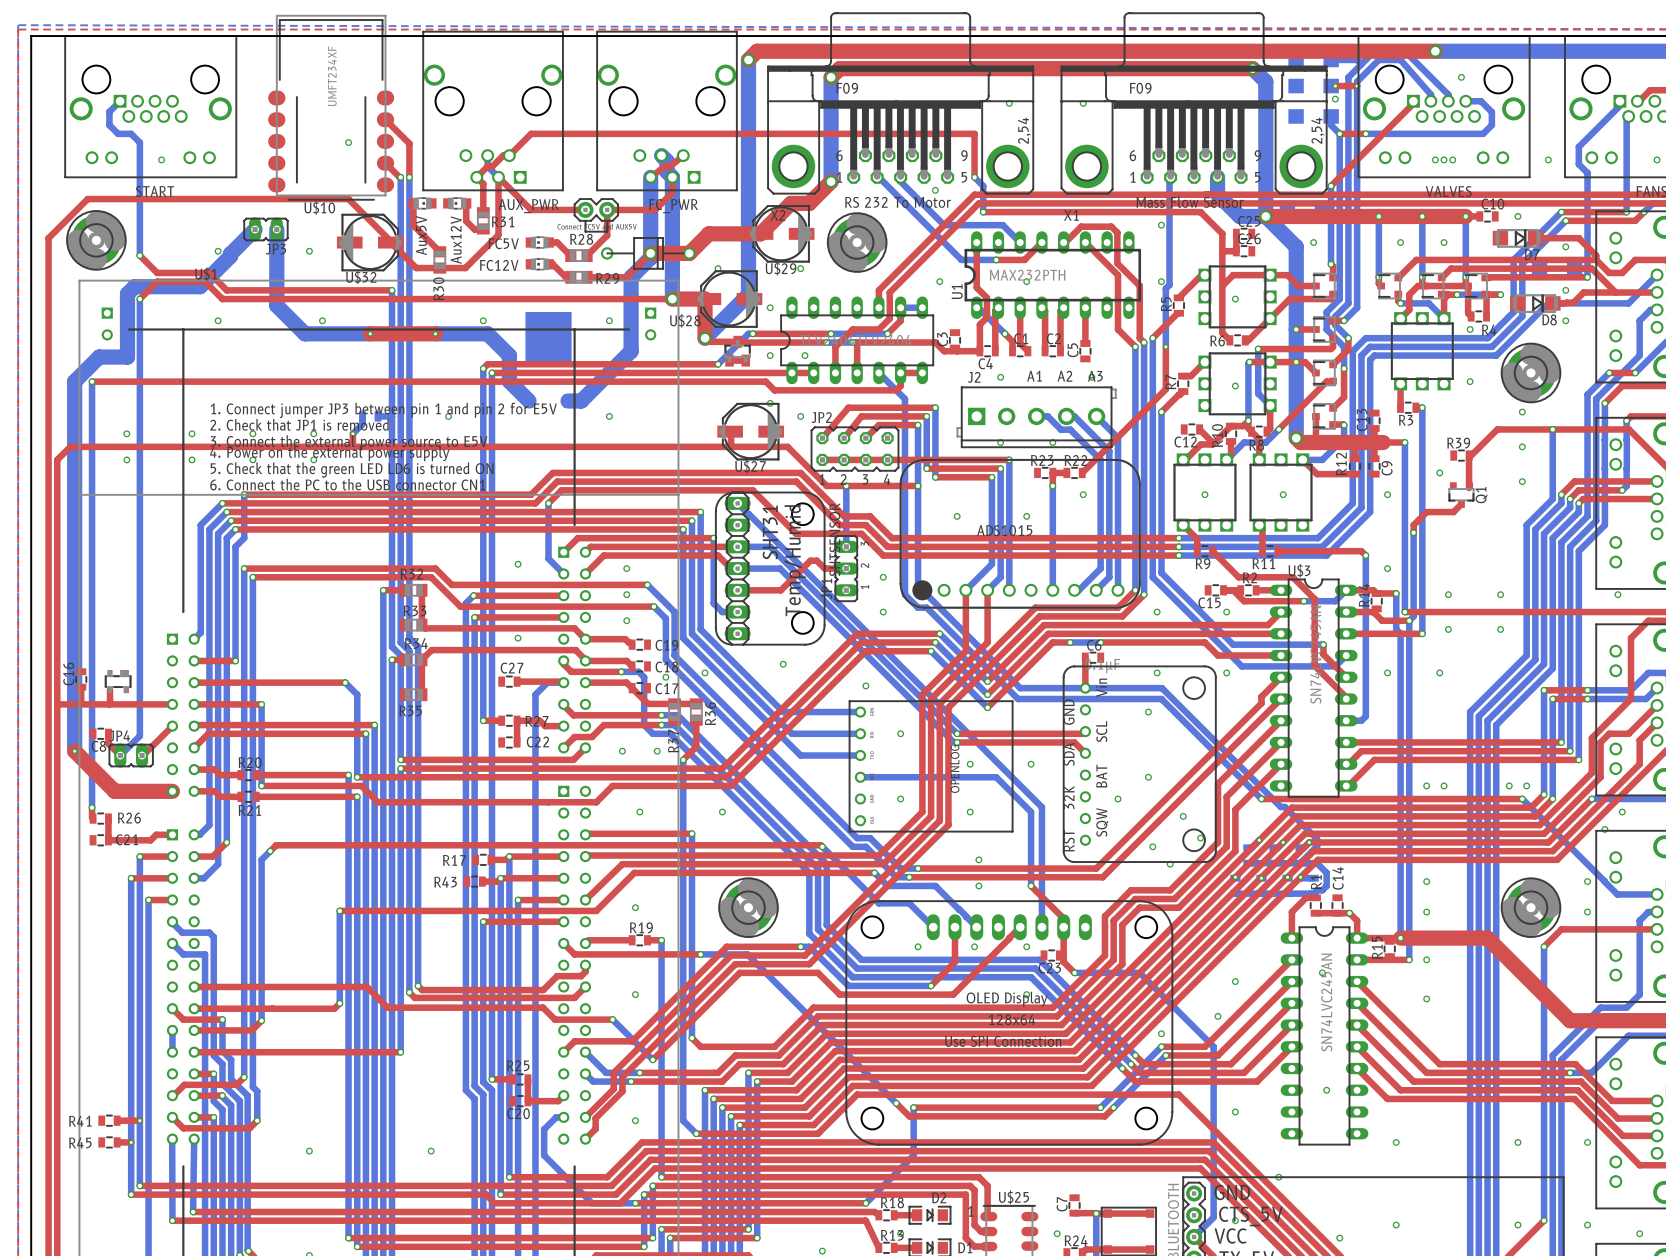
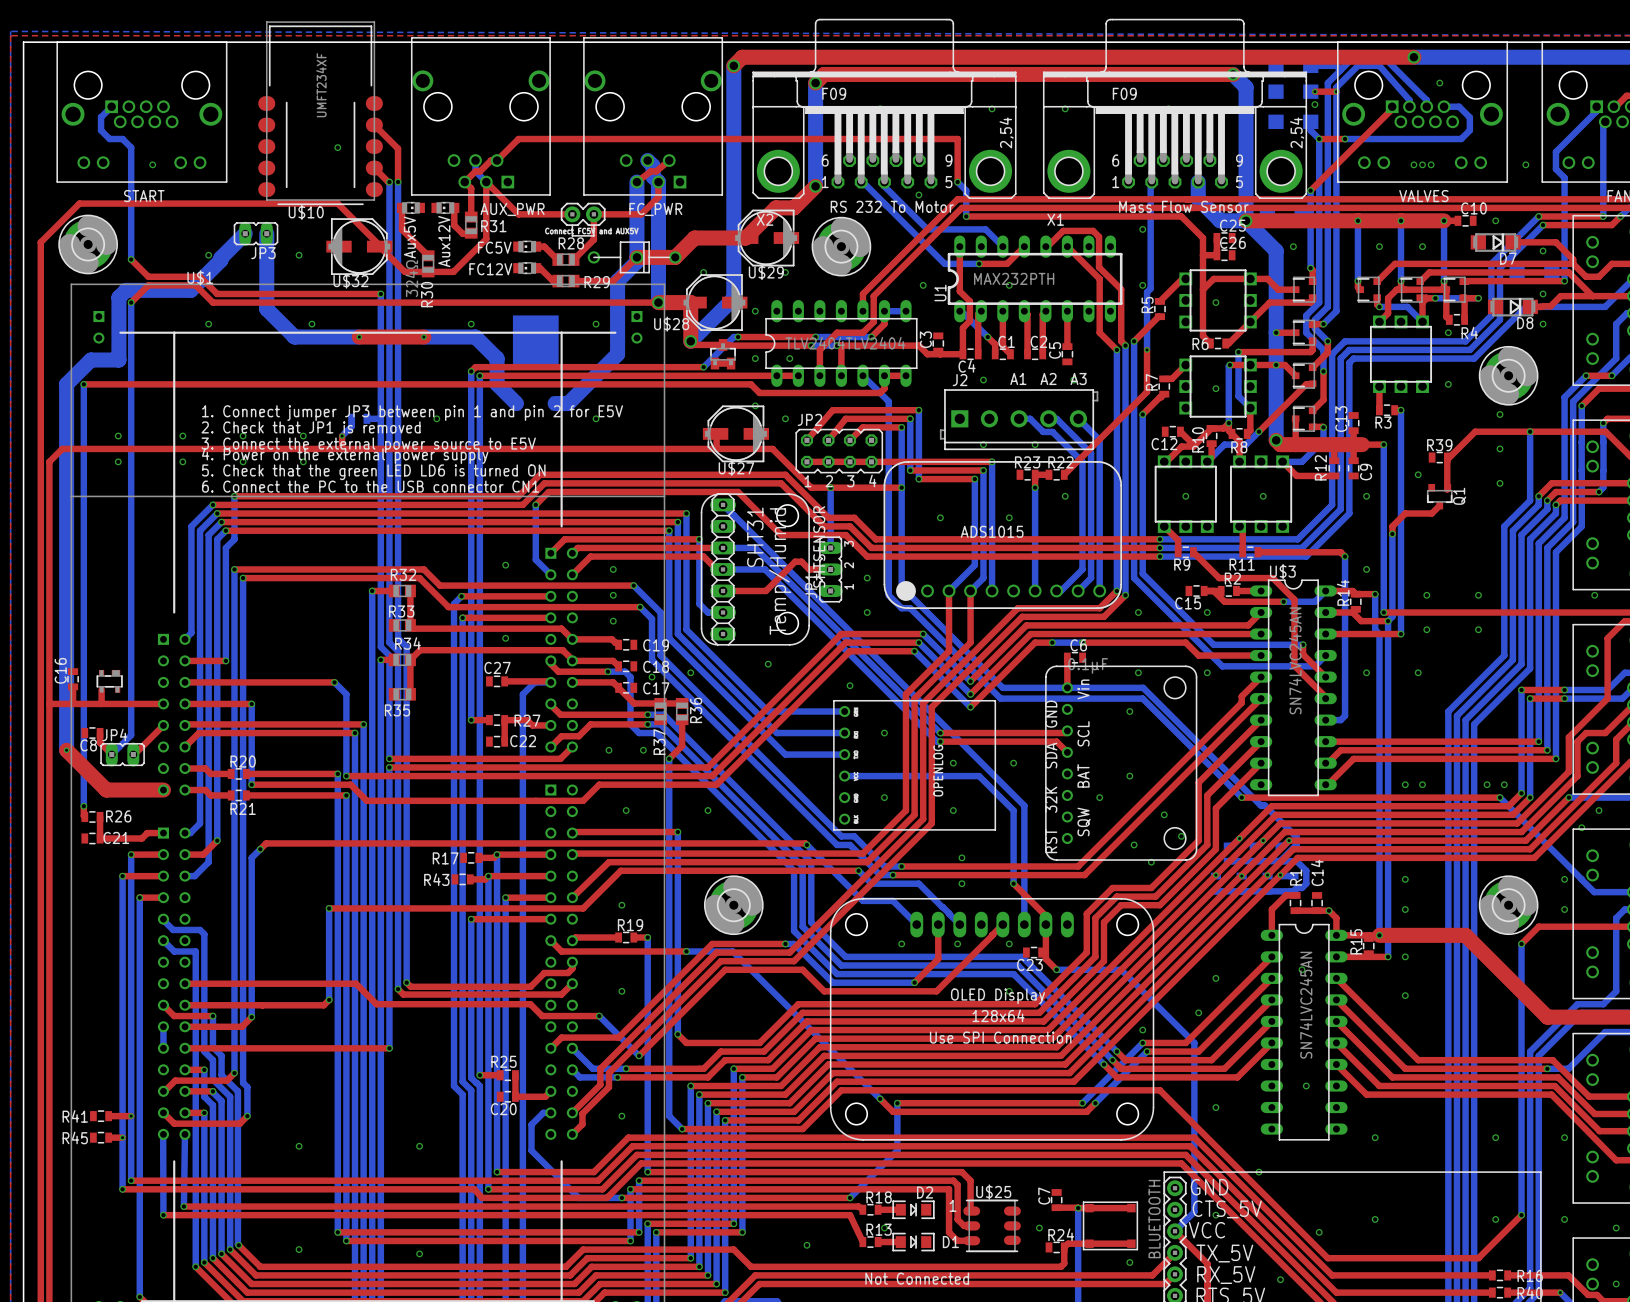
R30 value: none -> 324Ω (411, 278)

